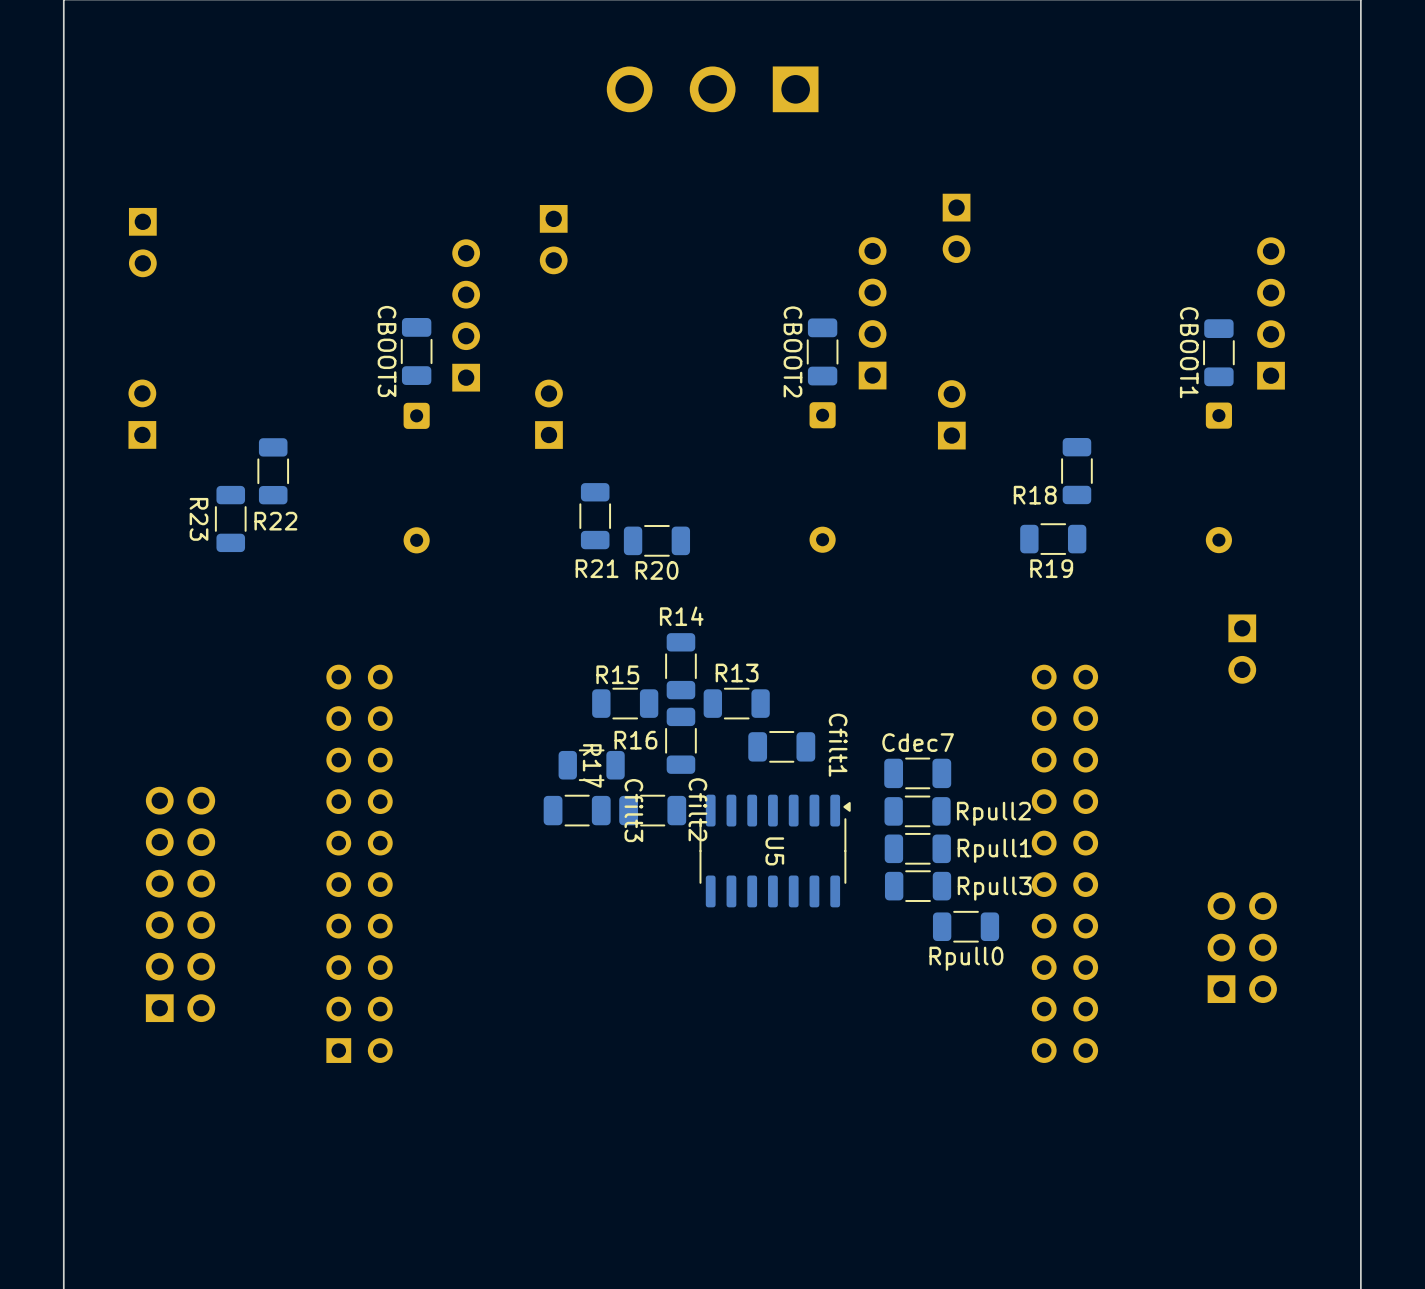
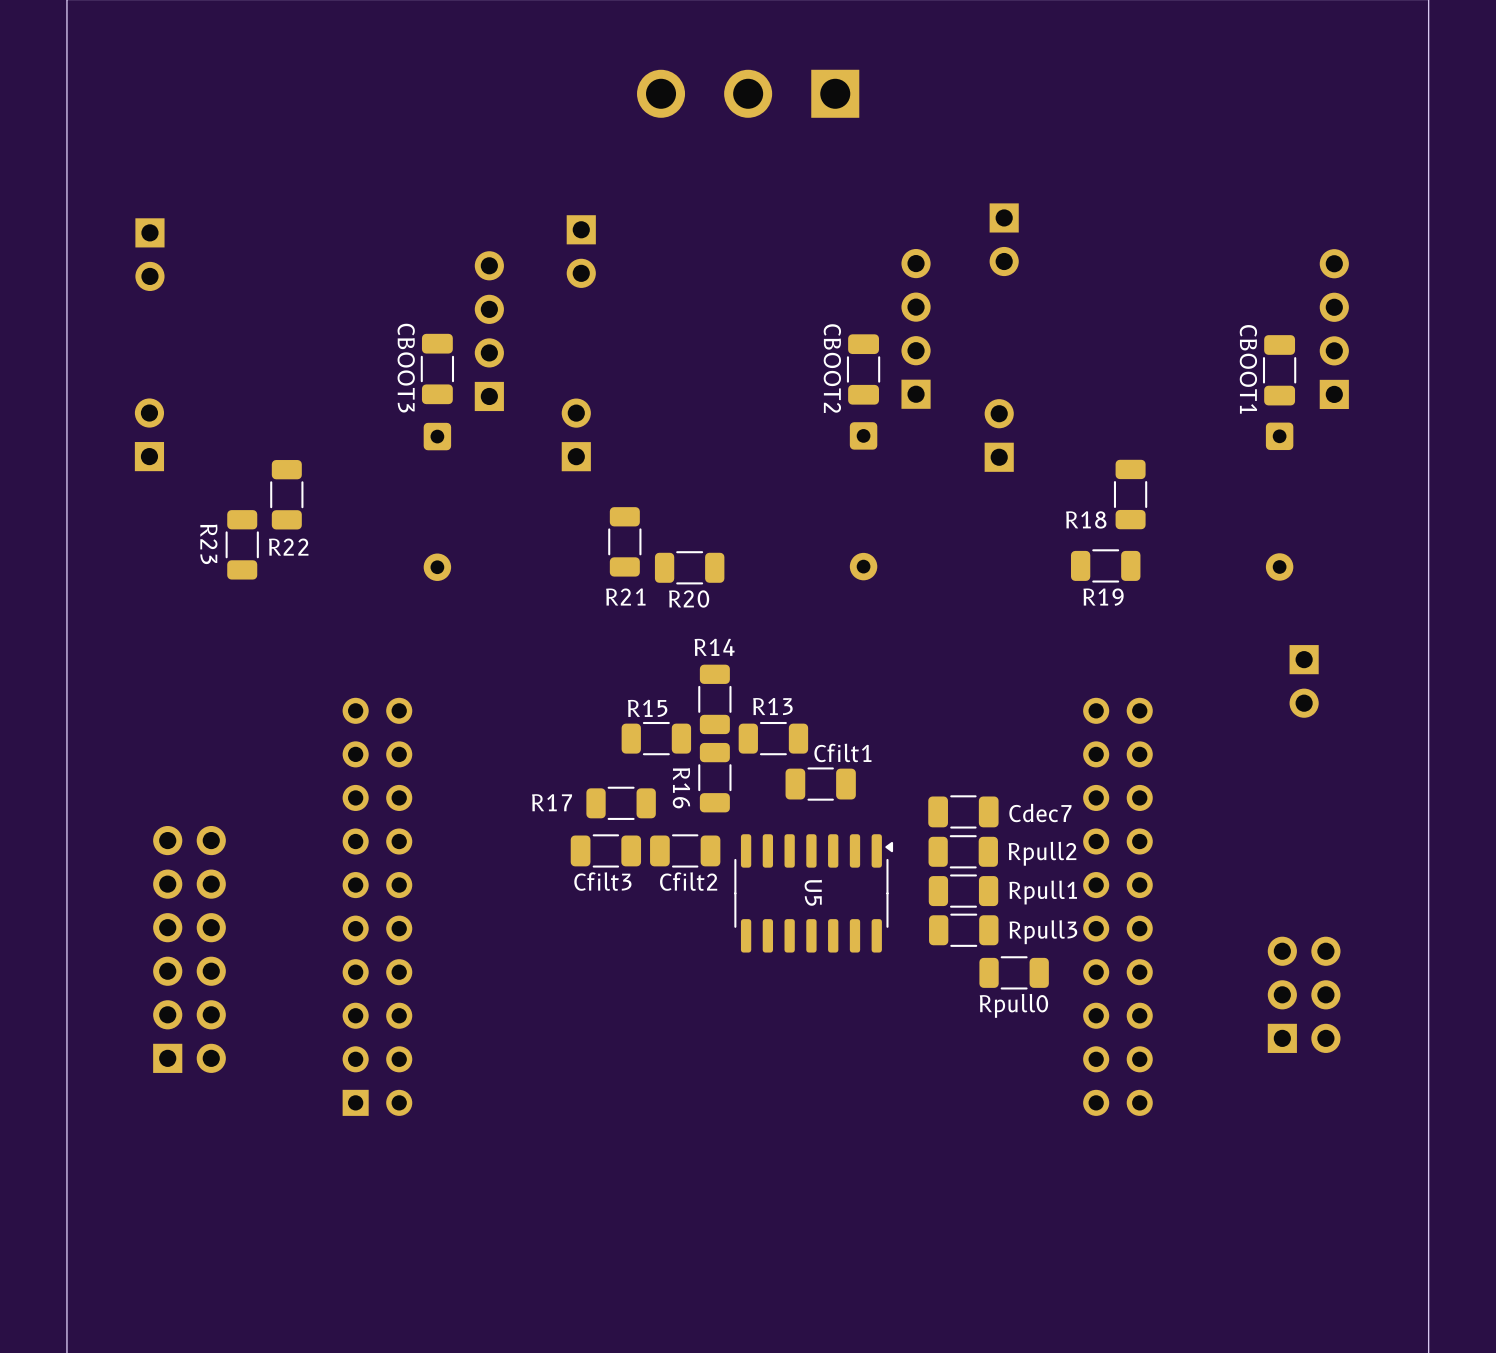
R16 name rotation: 0° (635, 740) -> 90° clockwise (681, 788)
Cdec7 name position: Cdec7 (918, 742) -> Cdec7 (1040, 812)
Cfilt1 name rotation: 0° (838, 745) -> 90° counterclockwise (842, 752)
R17 name rotation: 0° (592, 766) -> 90° counterclockwise (552, 802)
R17 name position: R17 (592, 766) -> R17 (552, 802)
Cfilt2 name rotation: 0° (697, 809) -> 90° counterclockwise (688, 881)
Cfilt3 name rotation: 0° (633, 810) -> 90° counterclockwise (602, 881)

